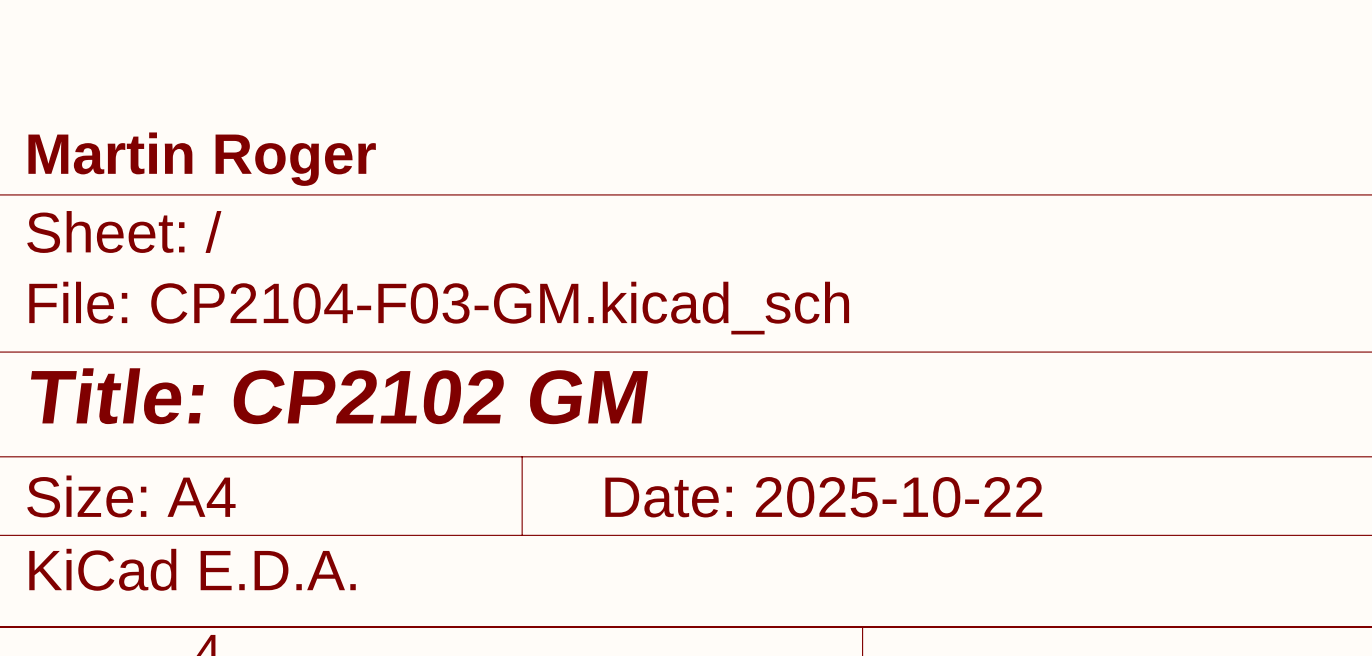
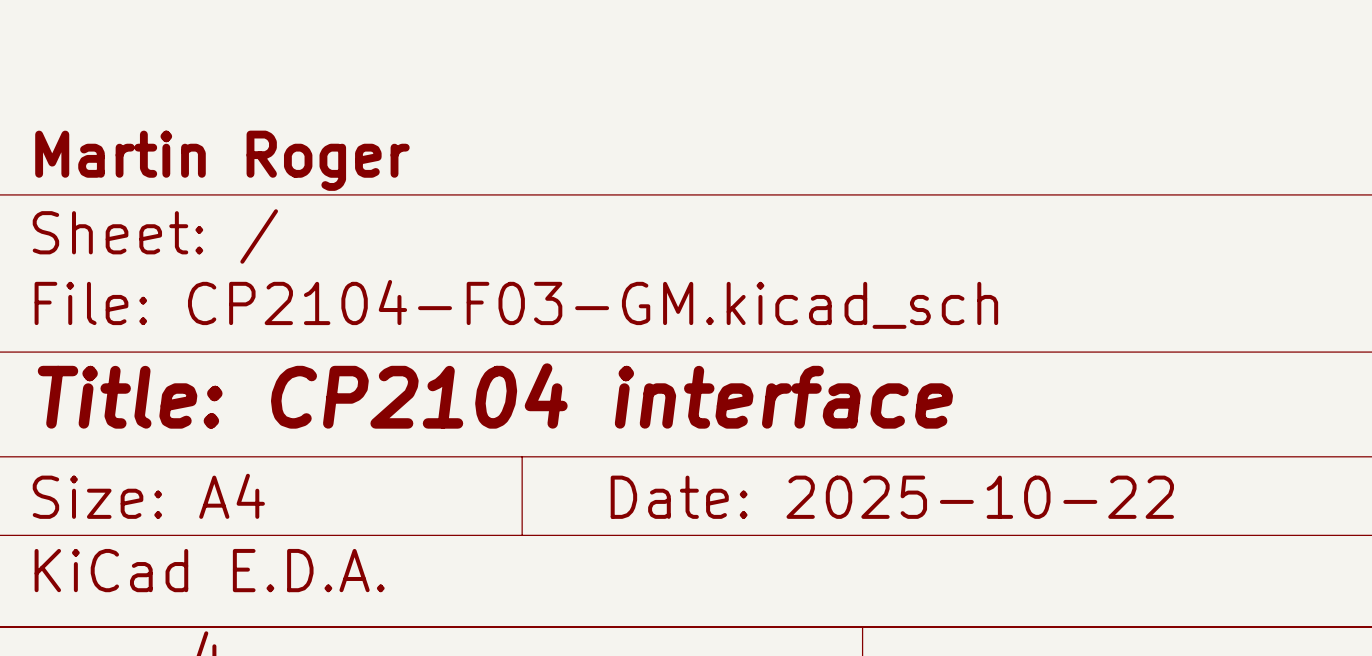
title block: Title: CP2102 GM (339, 396) -> Title: CP2104 interface (495, 395)

